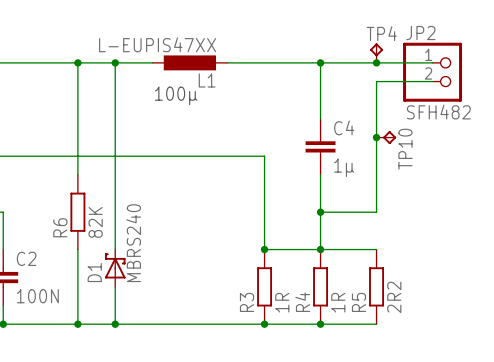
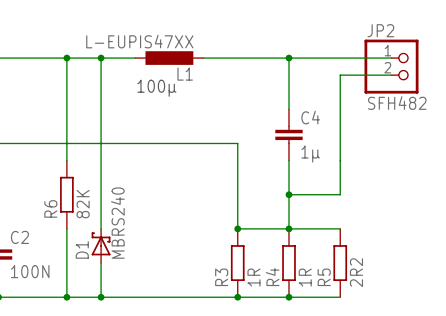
TP4: (376, 53) -> none
junction: (376, 62) -> none
junction: (376, 137) -> none
TP10: (386, 137) -> none

